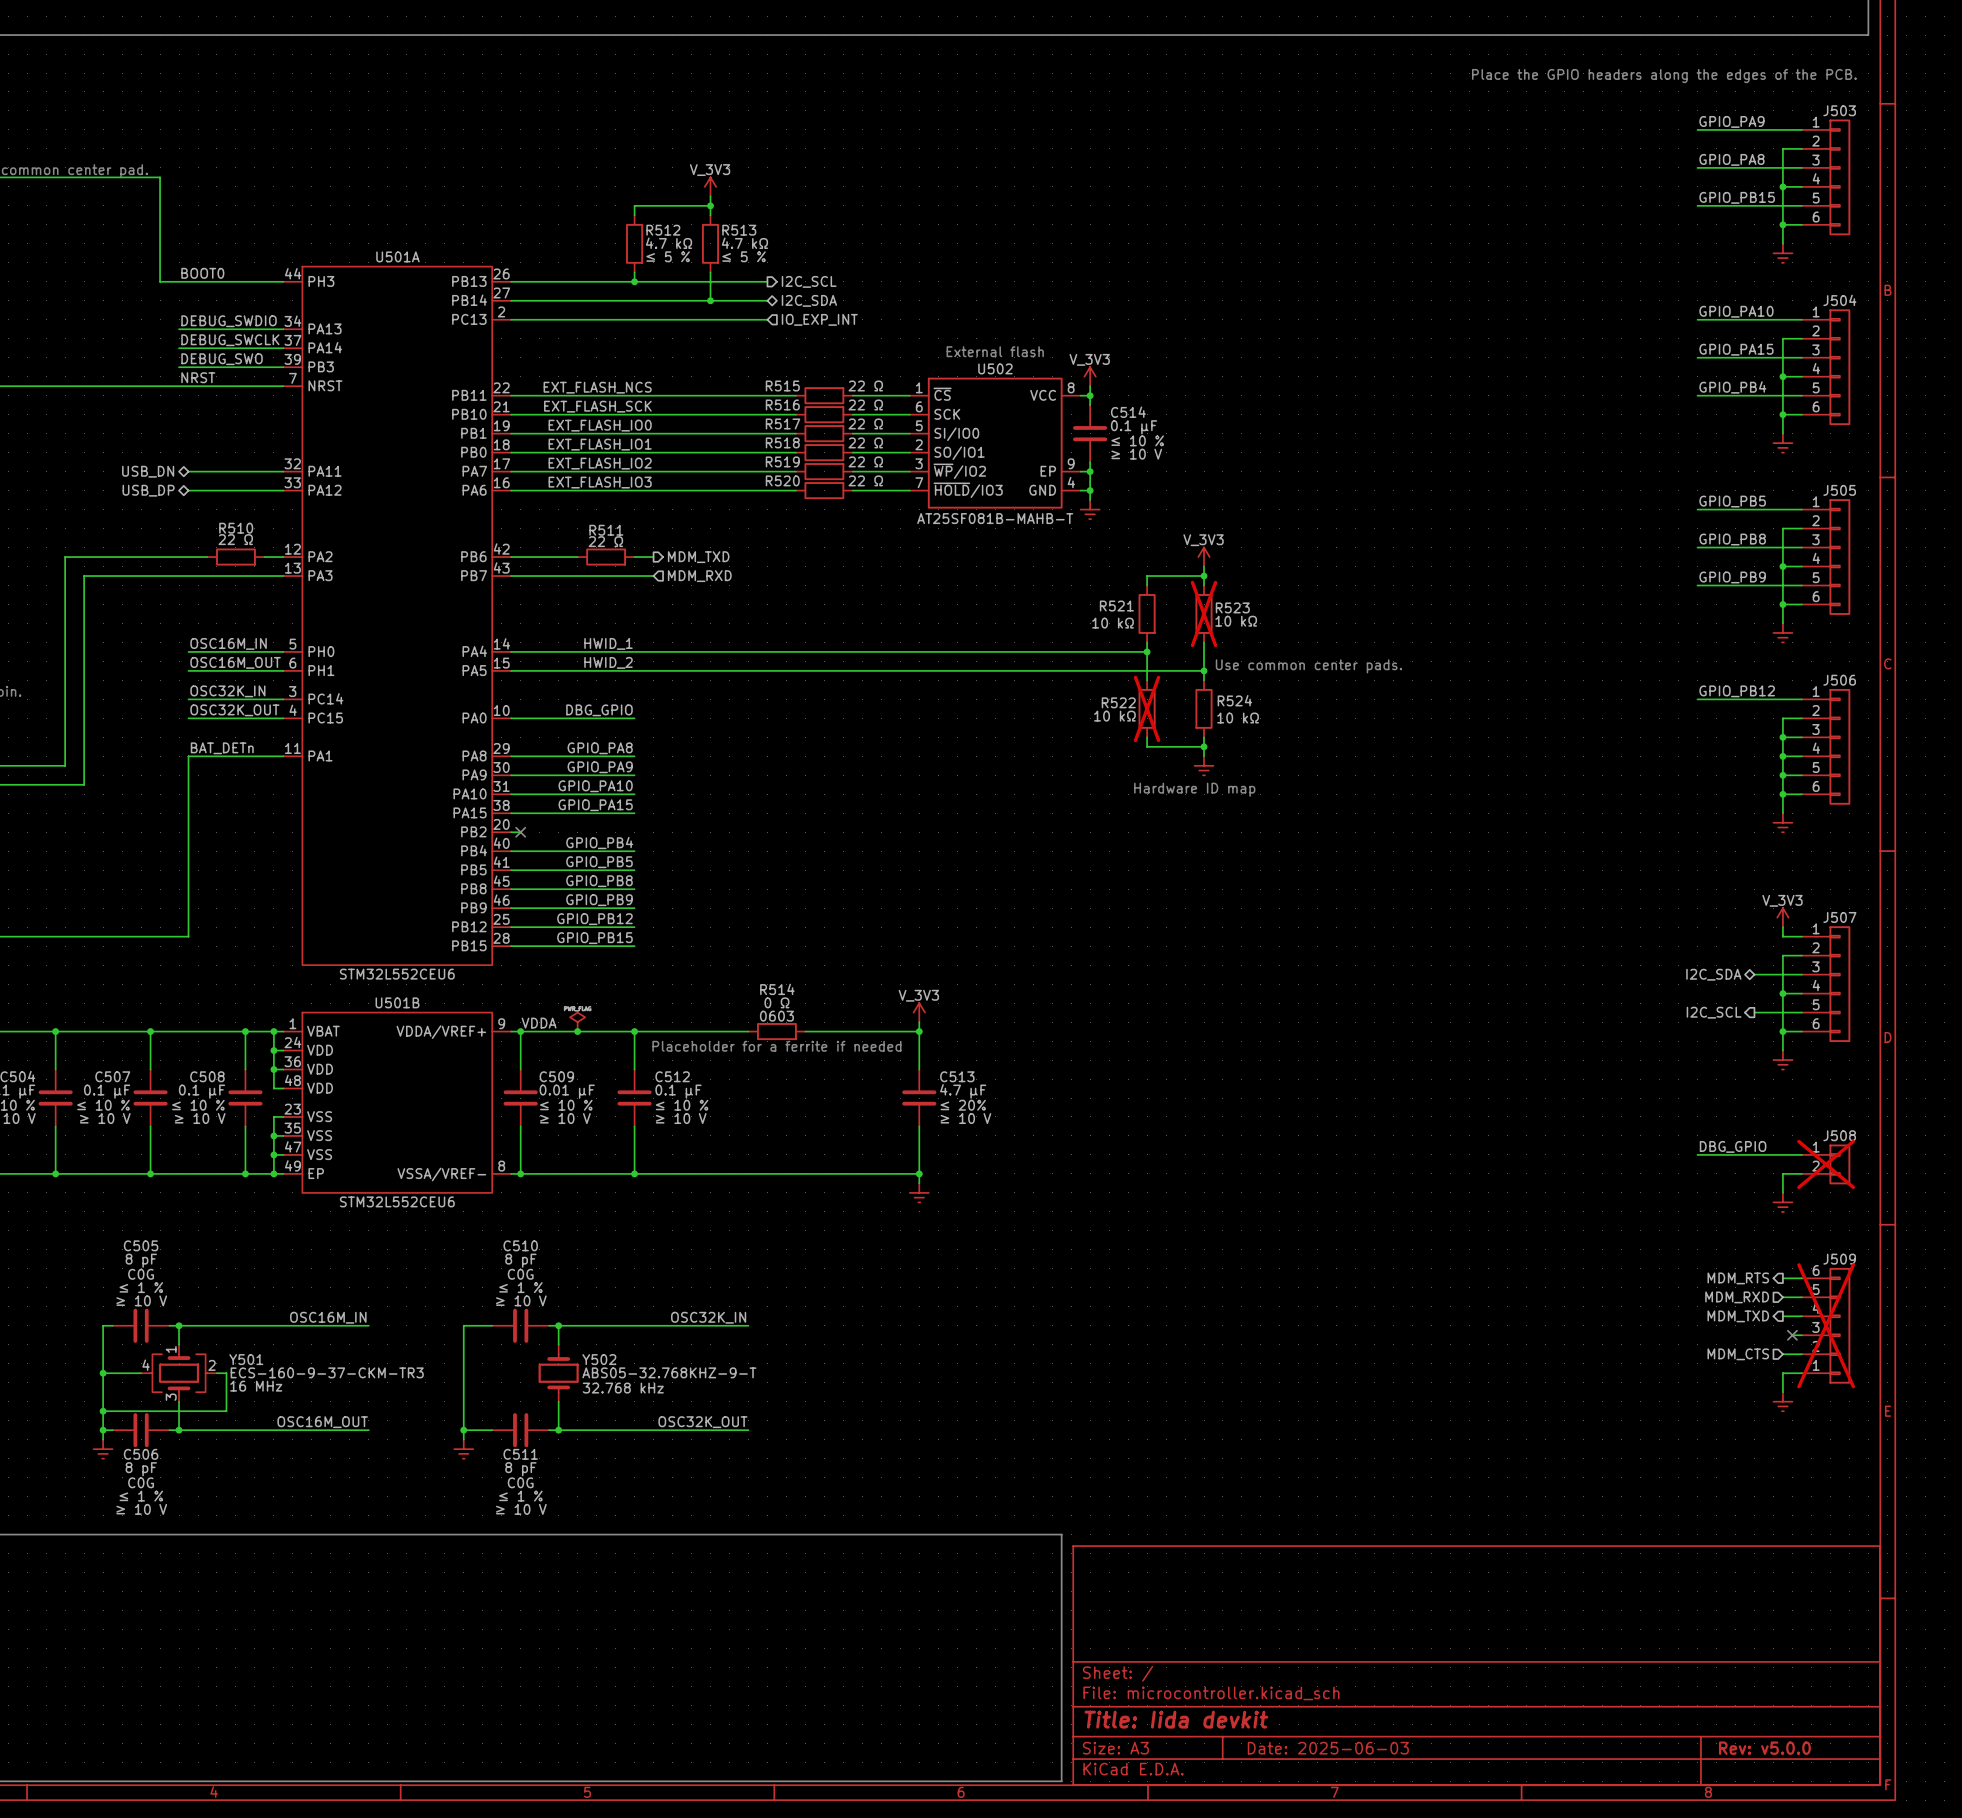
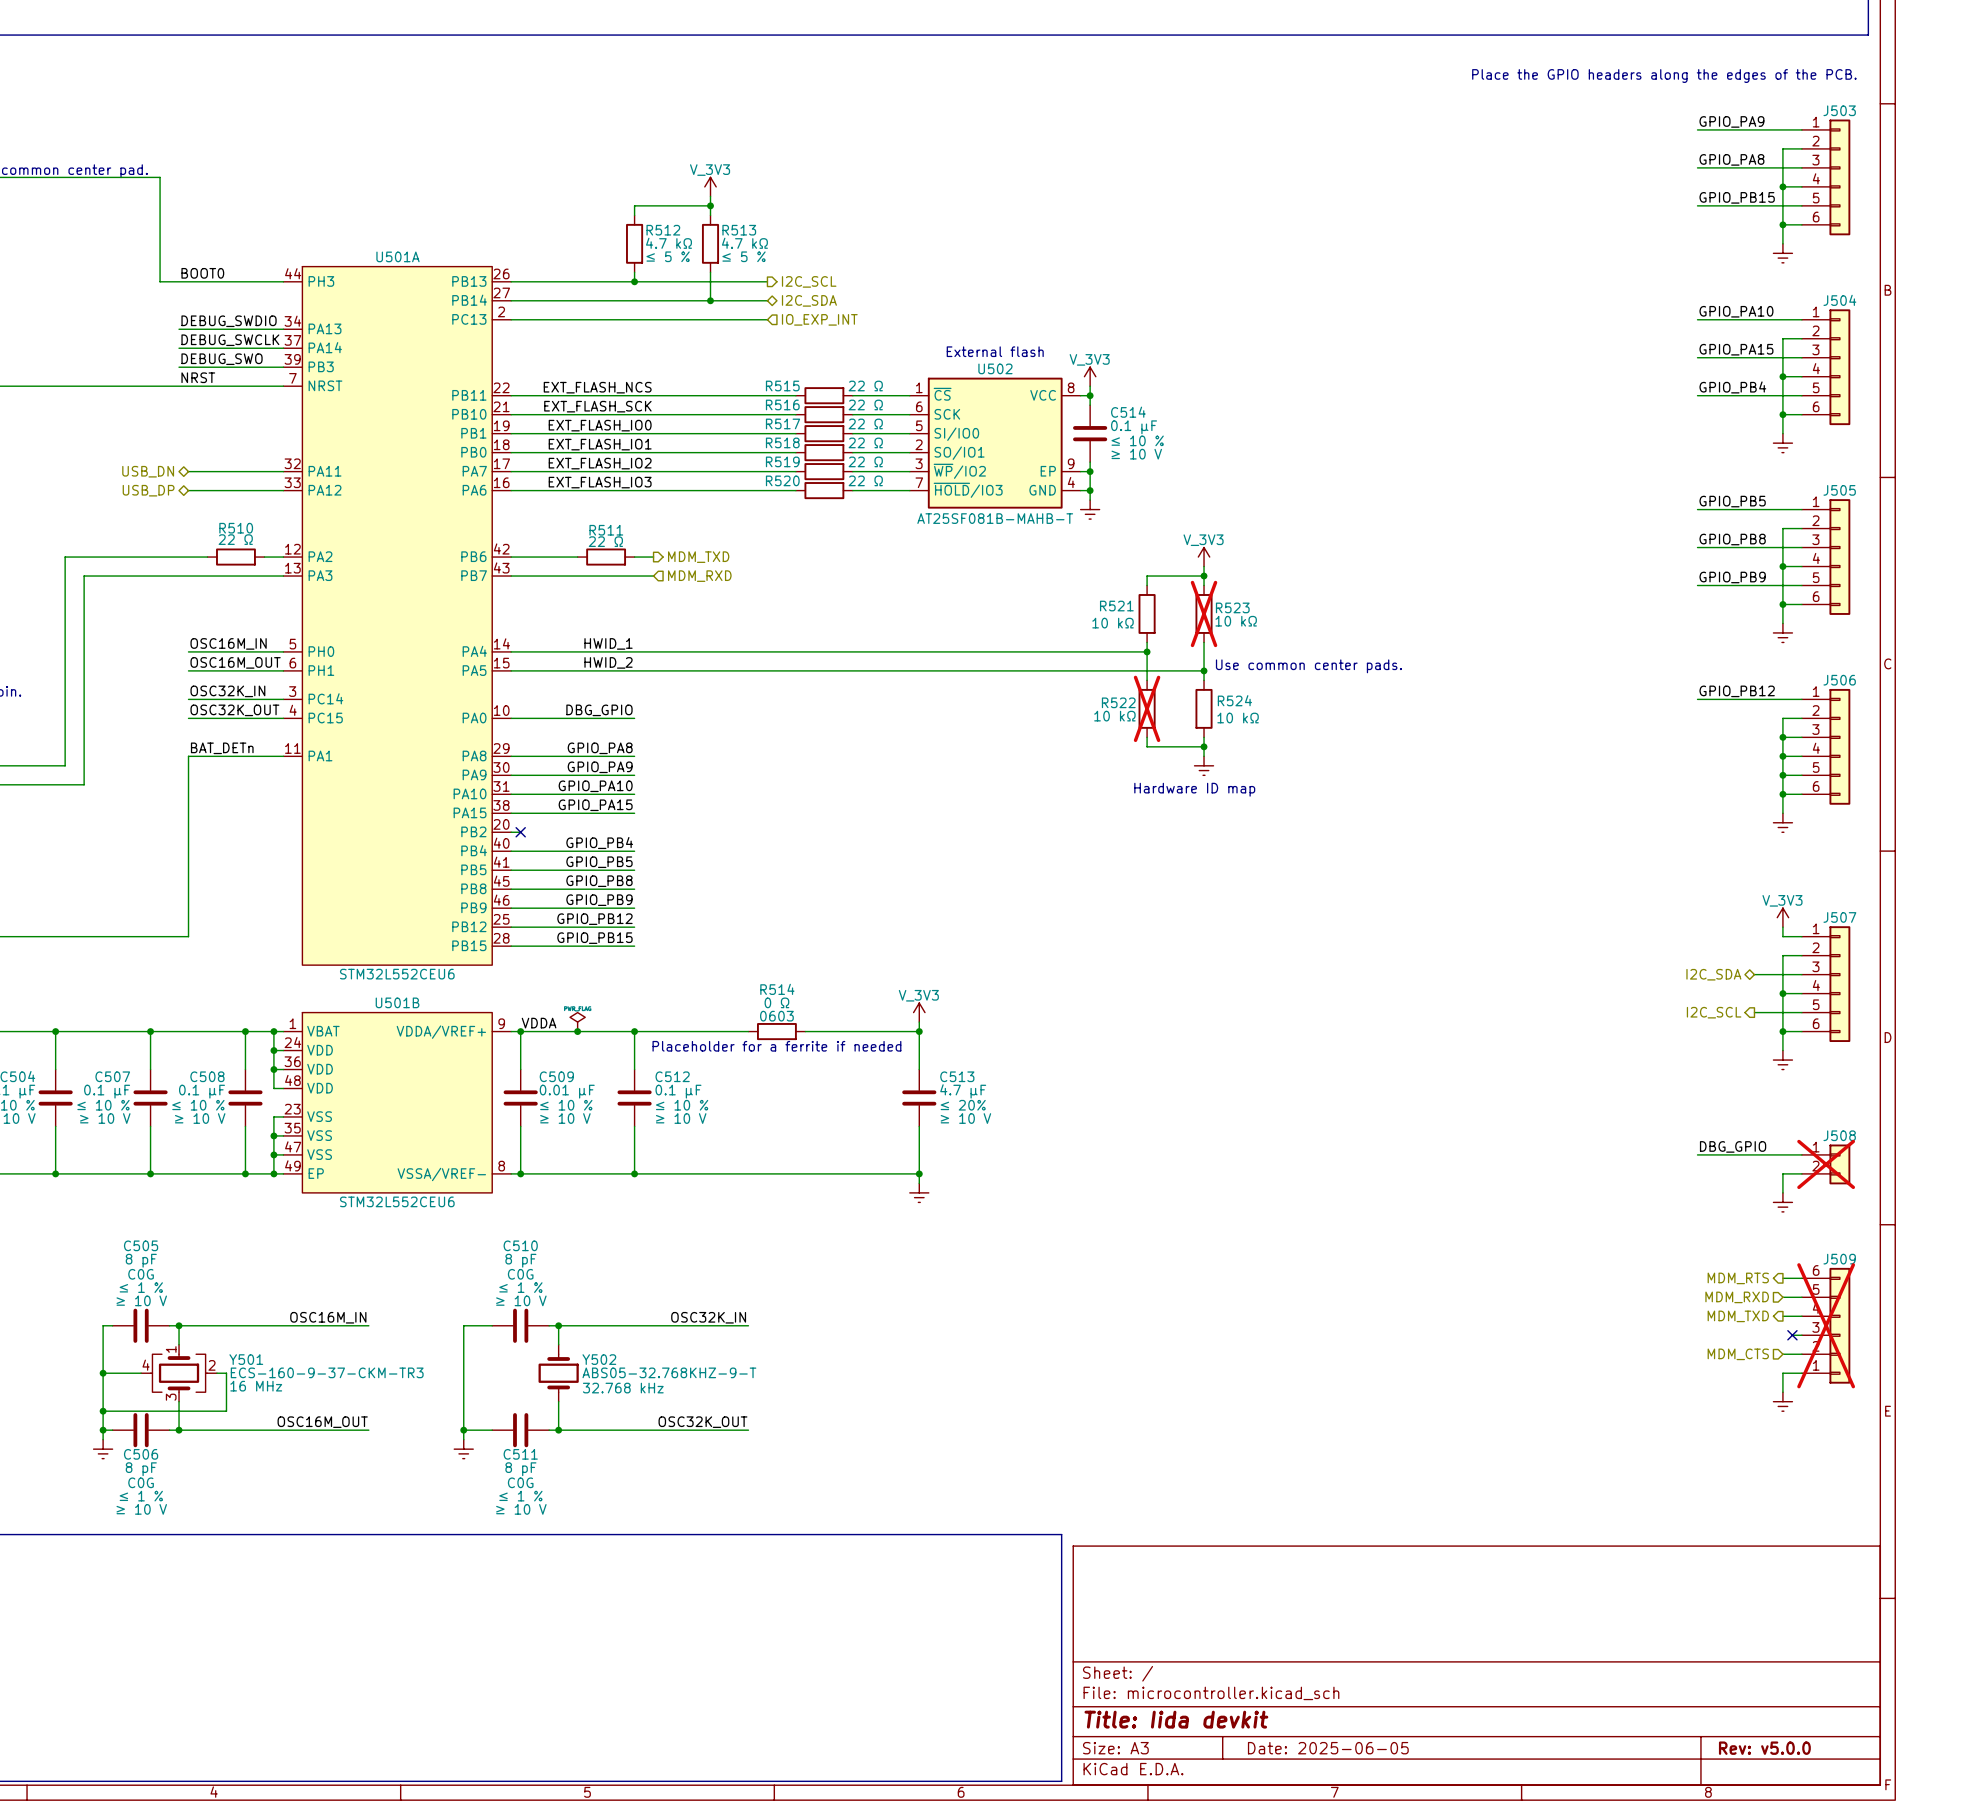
title block: Date: 2025-06-03 (1328, 1748) -> Date: 2025-06-05 (1328, 1748)

